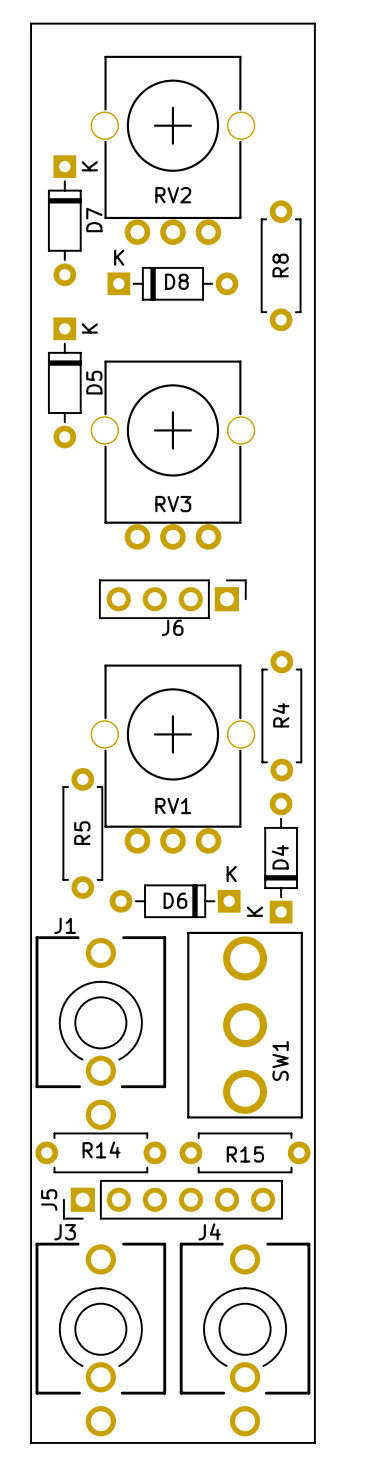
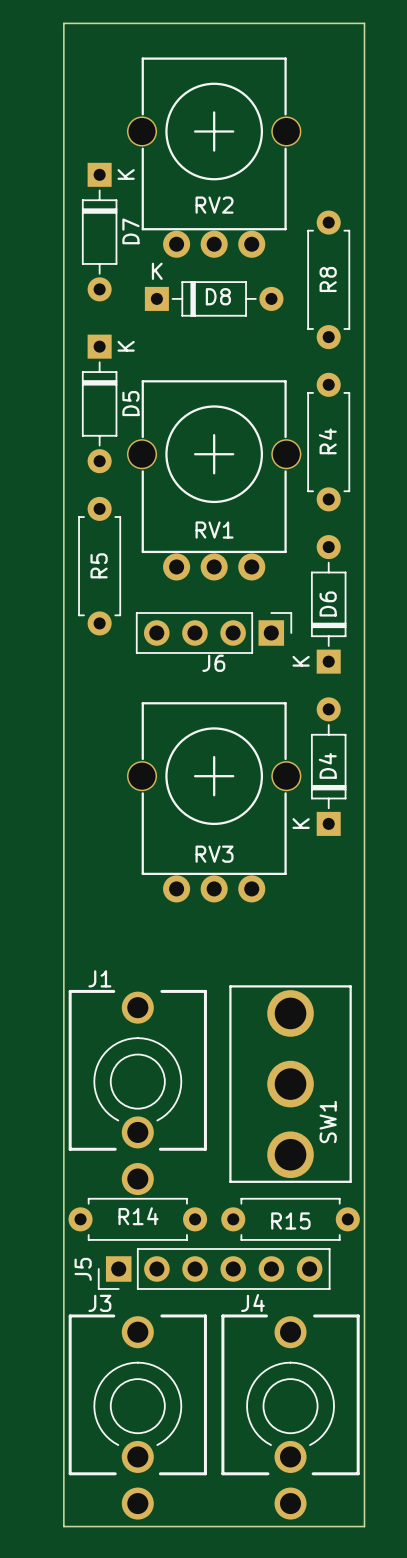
RV3 name: RV3 (173, 504) -> RV1 (214, 530)
R4 position: (281, 715) -> (328, 442)
RV1 name: RV1 (173, 806) -> RV3 (214, 854)
R5 position: (82, 833) -> (99, 566)
D4 position: (281, 857) -> (328, 766)
D6 footprint: [109, 884, 241, 919] -> [310, 535, 347, 674]

